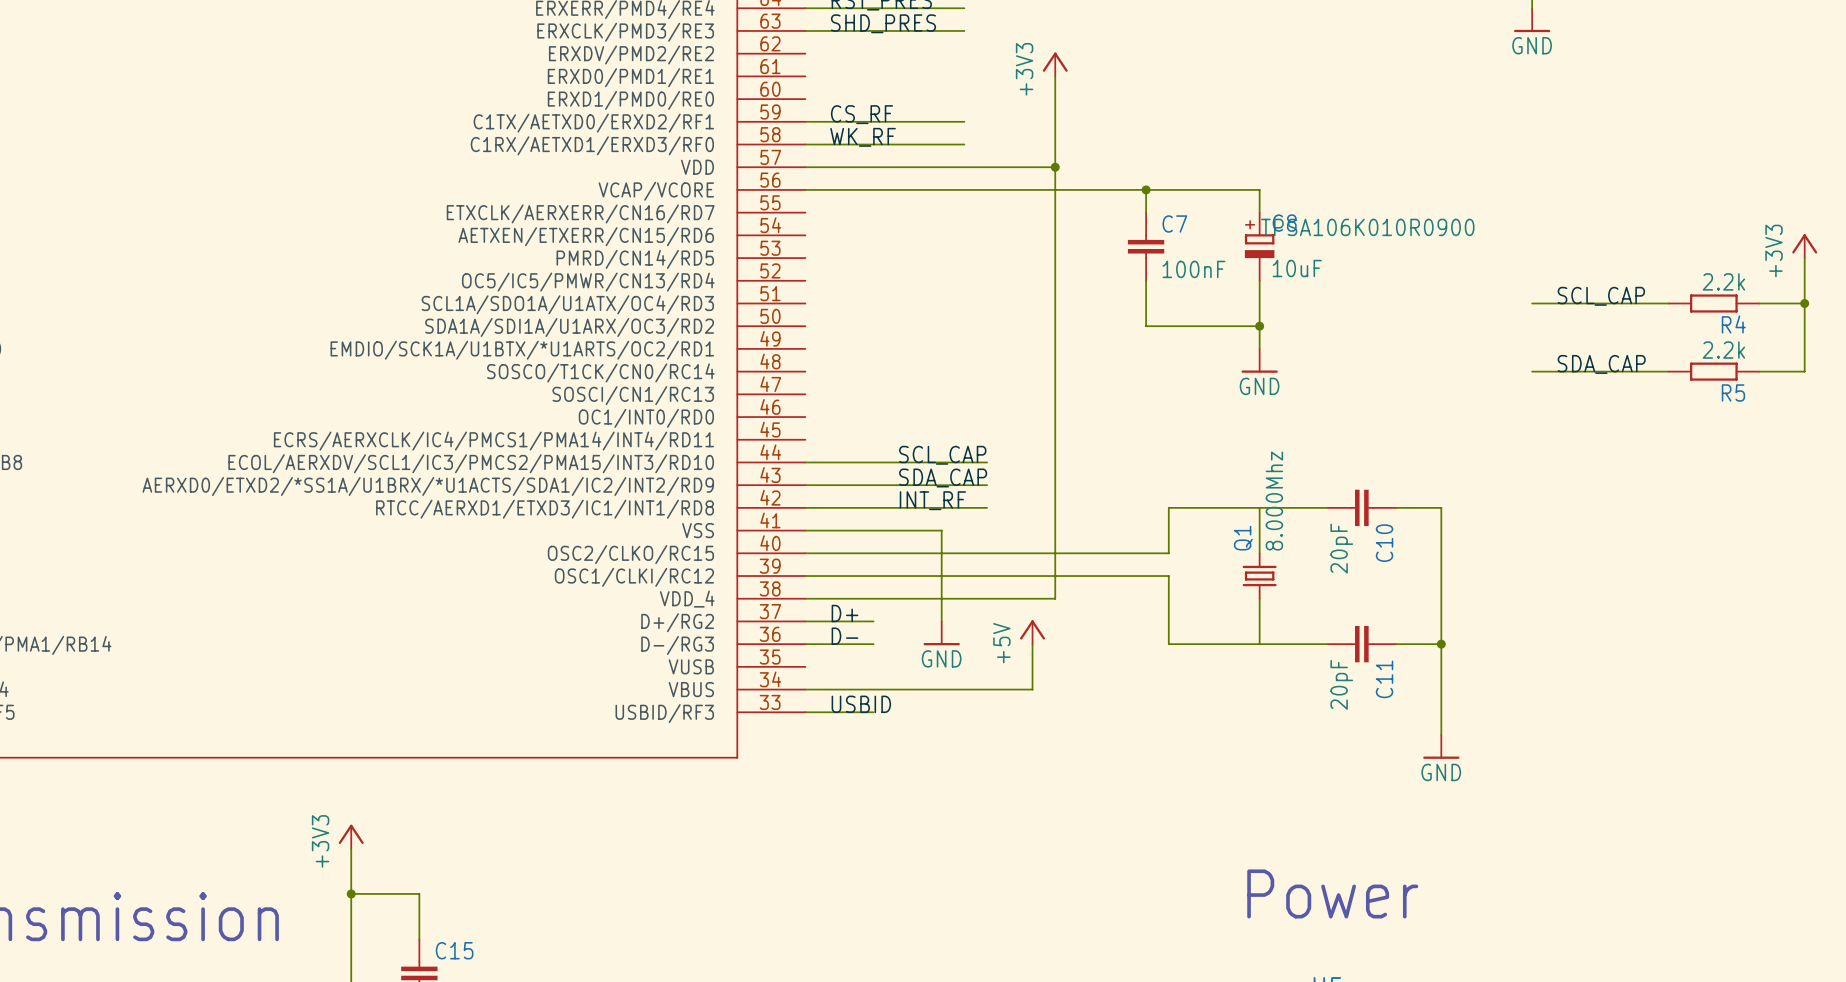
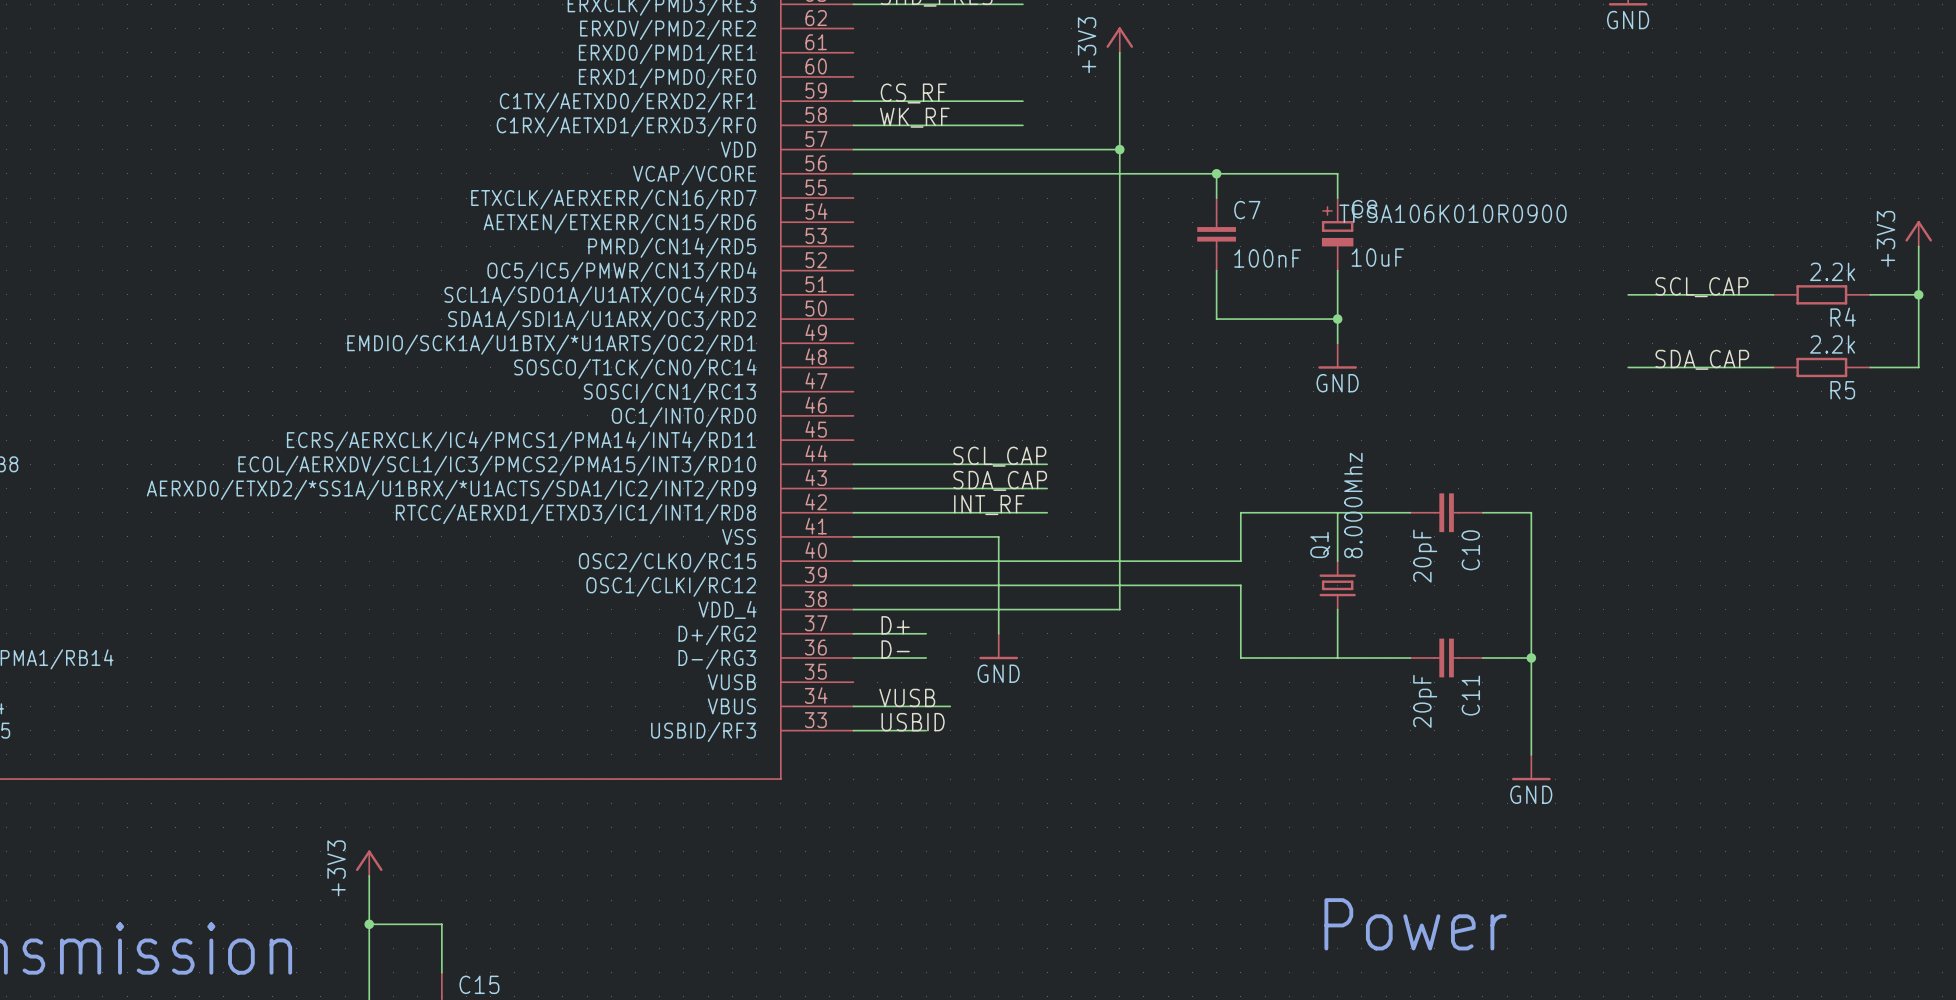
power symbol: +5V (1032, 632) -> none
wire: (1032, 644) (1032, 689) (896, 689) -> none
label: none -> VUSB (907, 697)

